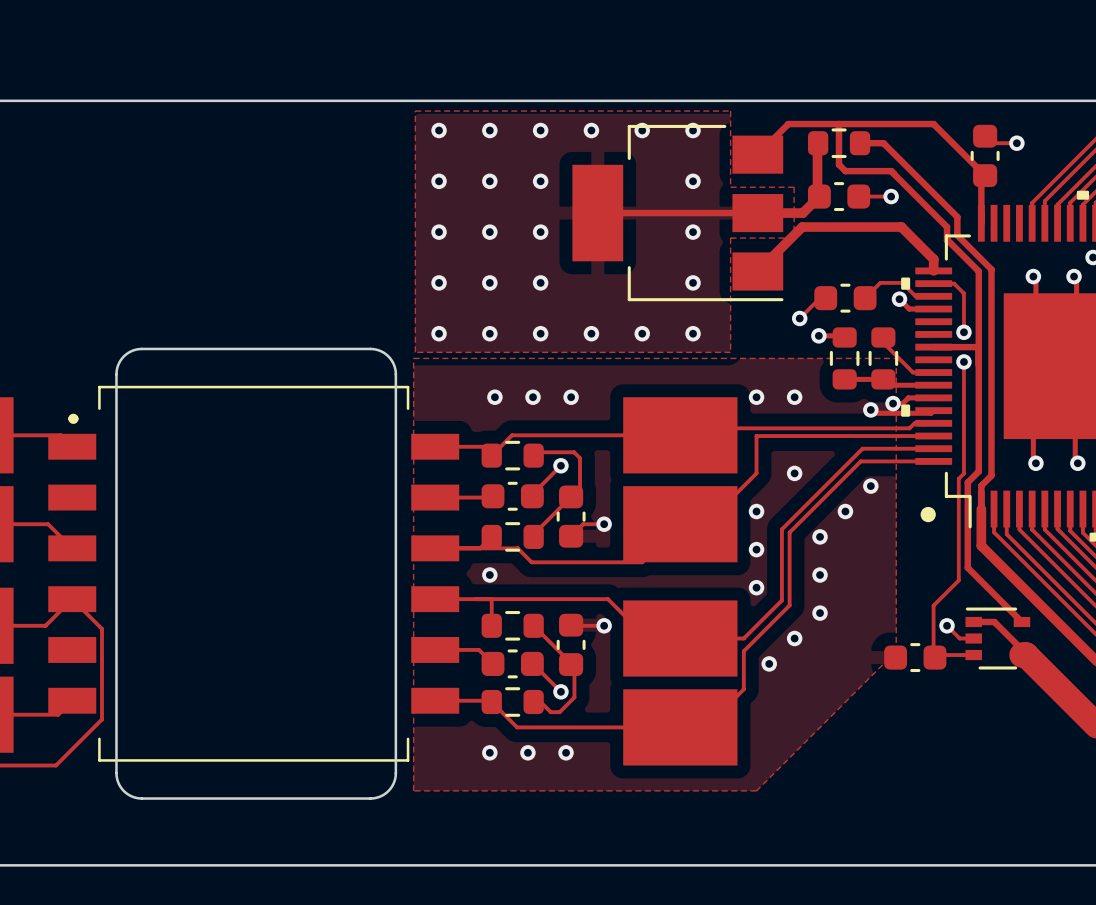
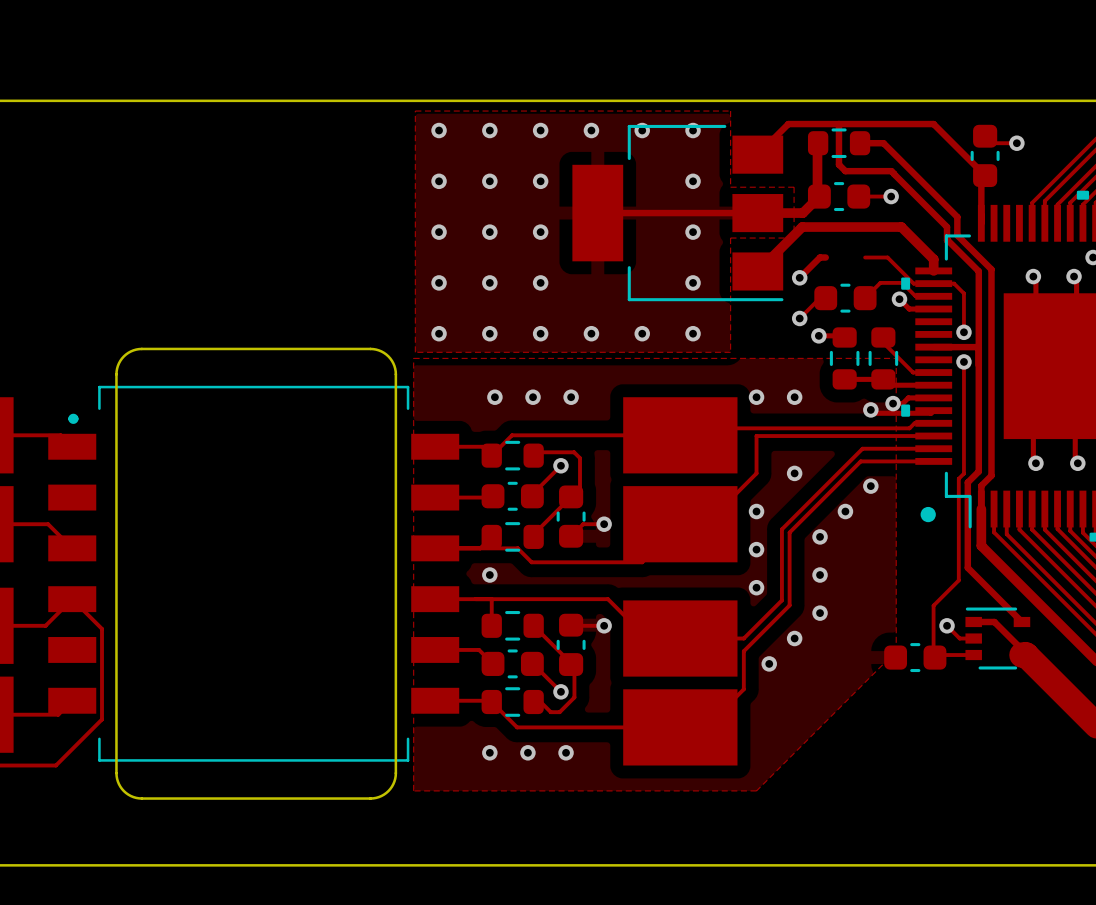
track: none -> (825, 257) (820, 257) (799, 277)
track: none -> (865, 257) (887, 257) (913, 283) (933, 283)
via: none -> (799, 277)

